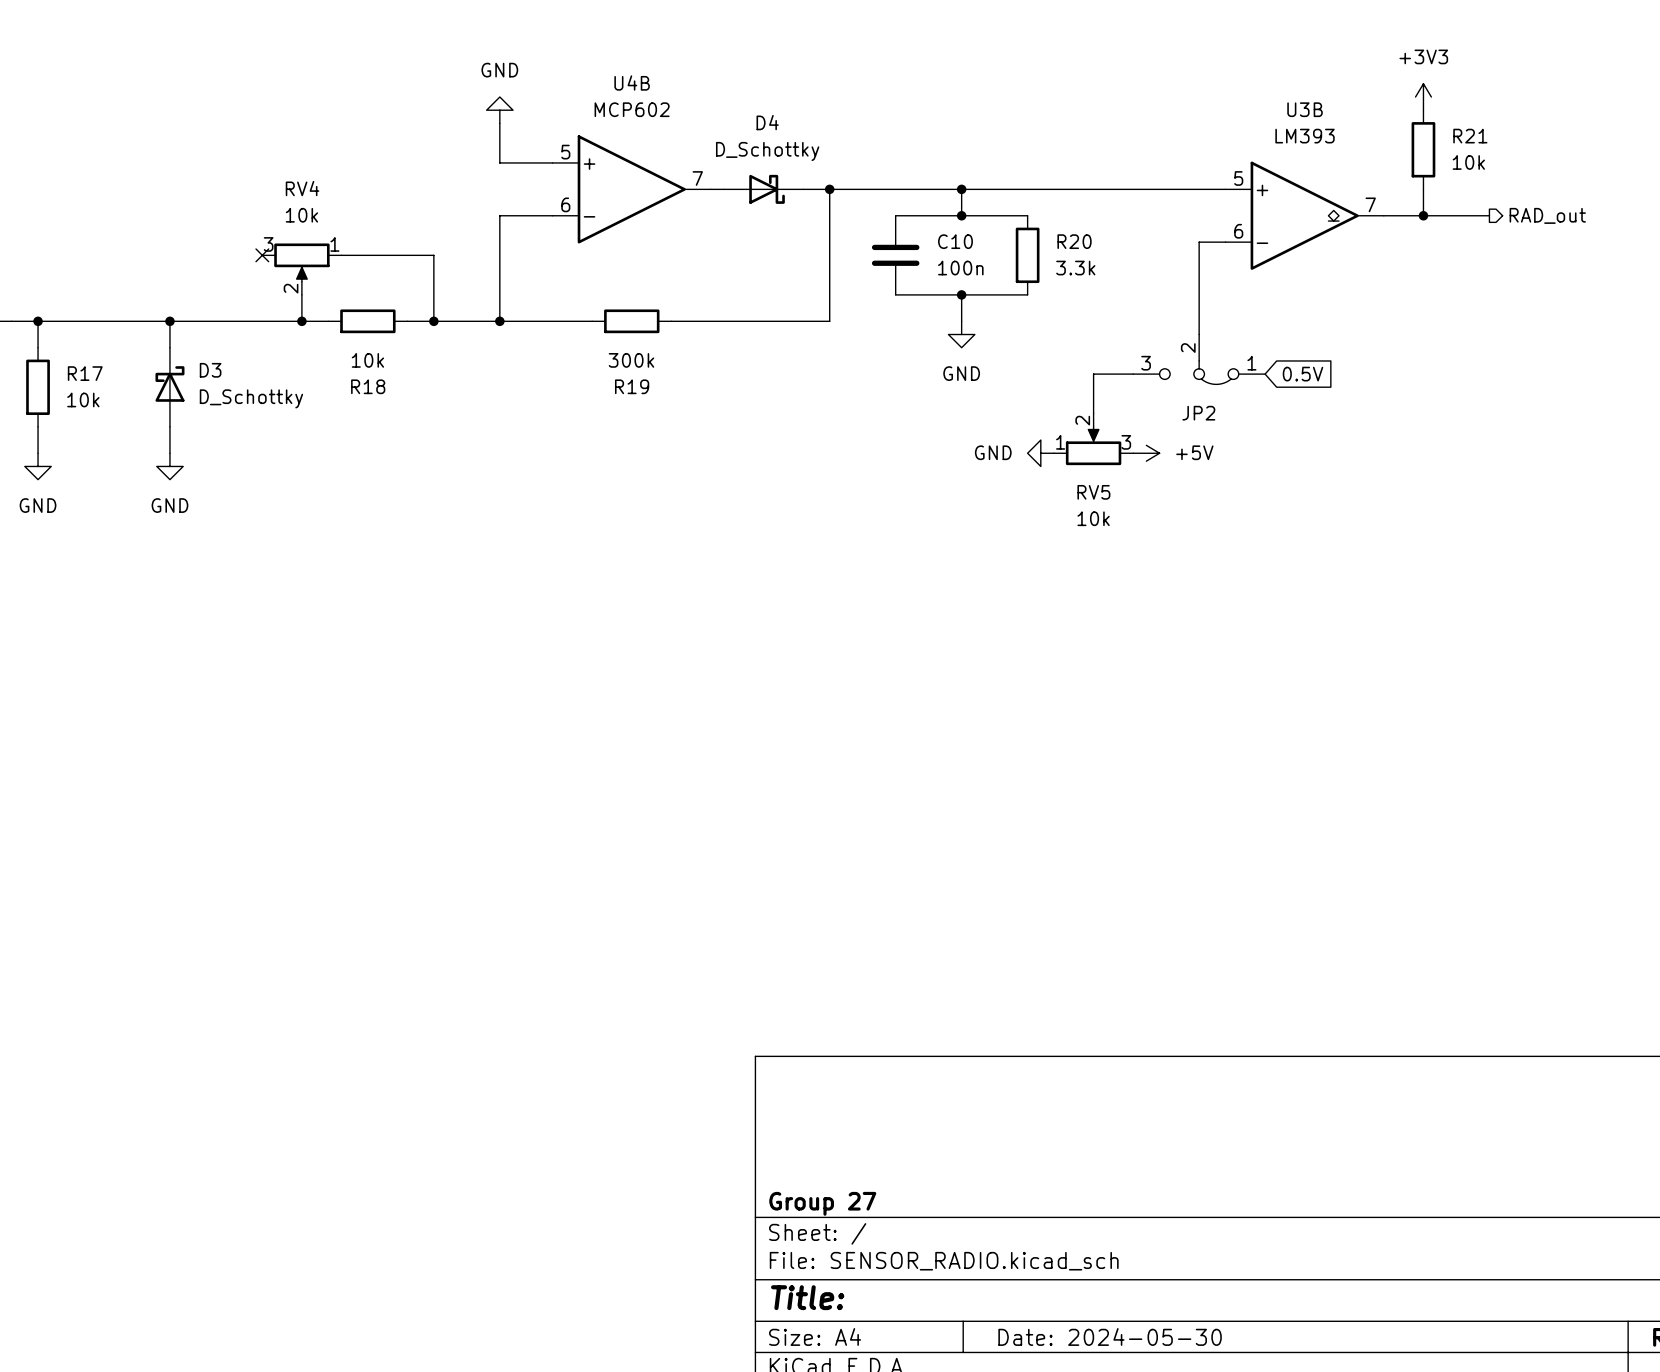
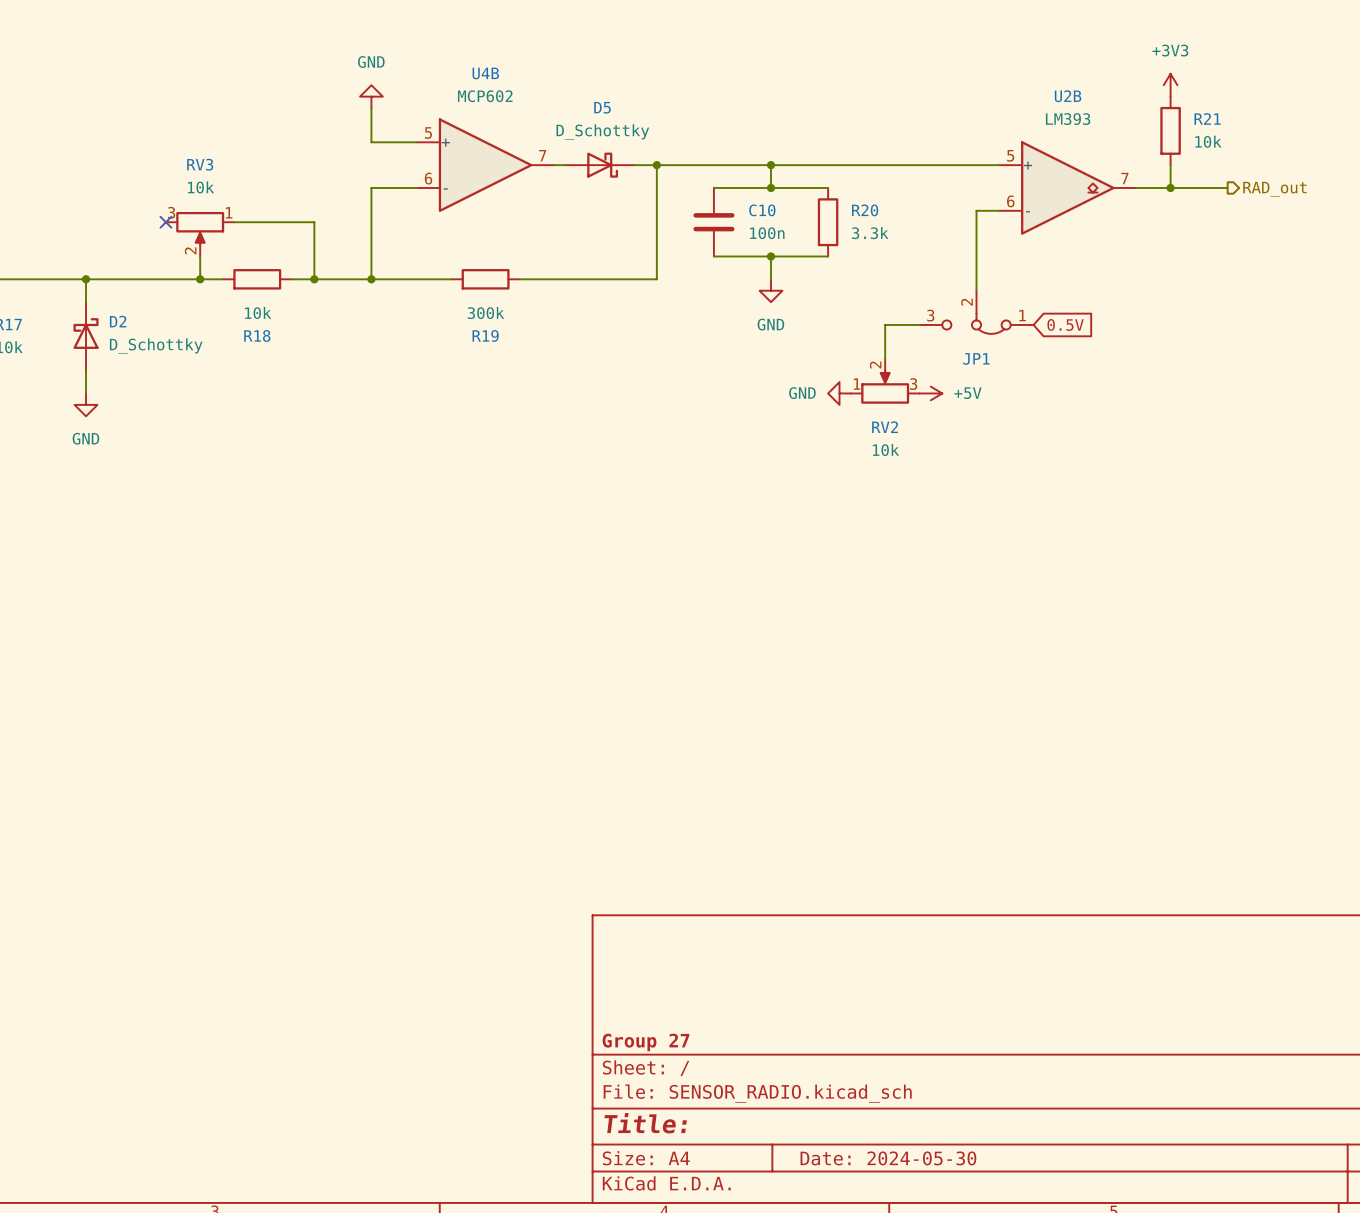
U3B name: U3B (1305, 109) -> U2B (1068, 96)
D4 name: D4 (767, 122) -> D5 (602, 107)
RV4 name: RV4 (302, 188) -> RV3 (200, 164)
D3 name: D3 (210, 370) -> D2 (118, 321)
JP2 name: JP2 (1198, 413) -> JP1 (976, 358)
RV5 name: RV5 (1093, 492) -> RV2 (885, 427)

